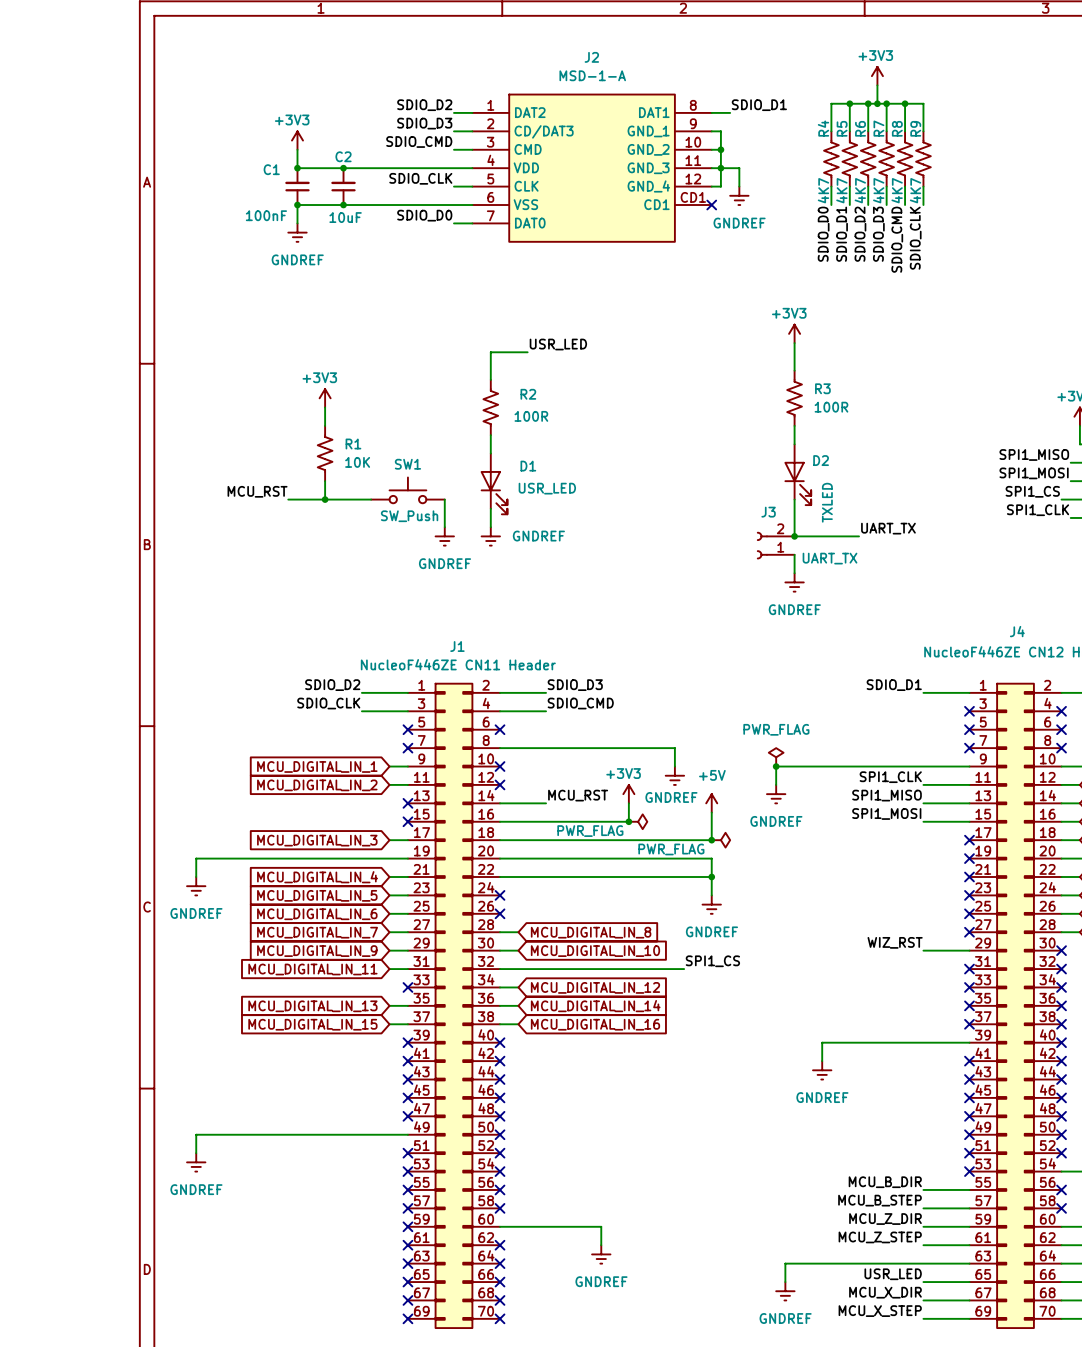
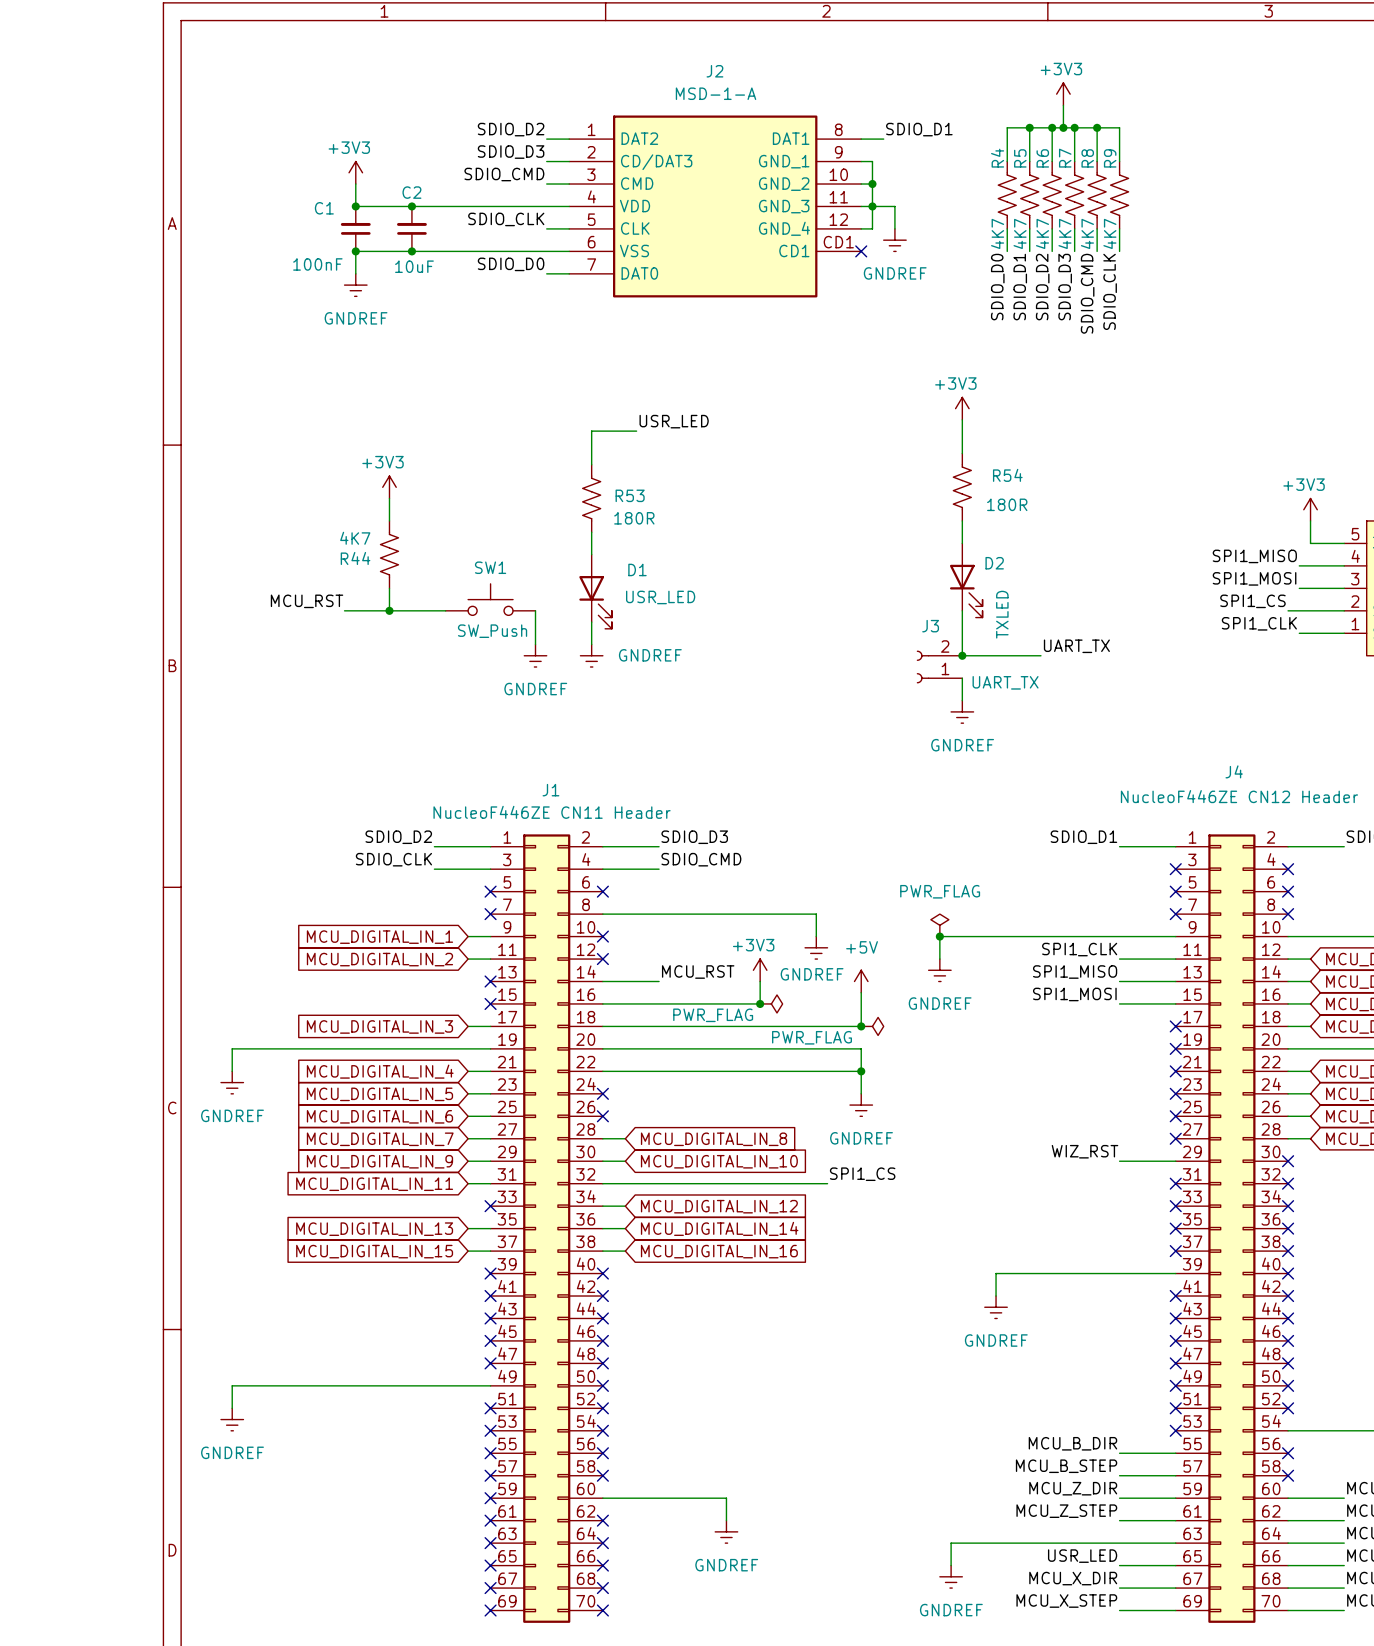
R3 name: R3 (822, 388) -> R54 (1007, 475)
R2 name: R2 (528, 394) -> R53 (630, 495)
R3 value: 100R (831, 407) -> 180R (1007, 504)
R2 value: 100R (531, 416) -> 180R (634, 518)
R1 name: R1 (353, 444) -> R44 (355, 558)
R1 value: 10K (357, 462) -> 4K7 (355, 538)

